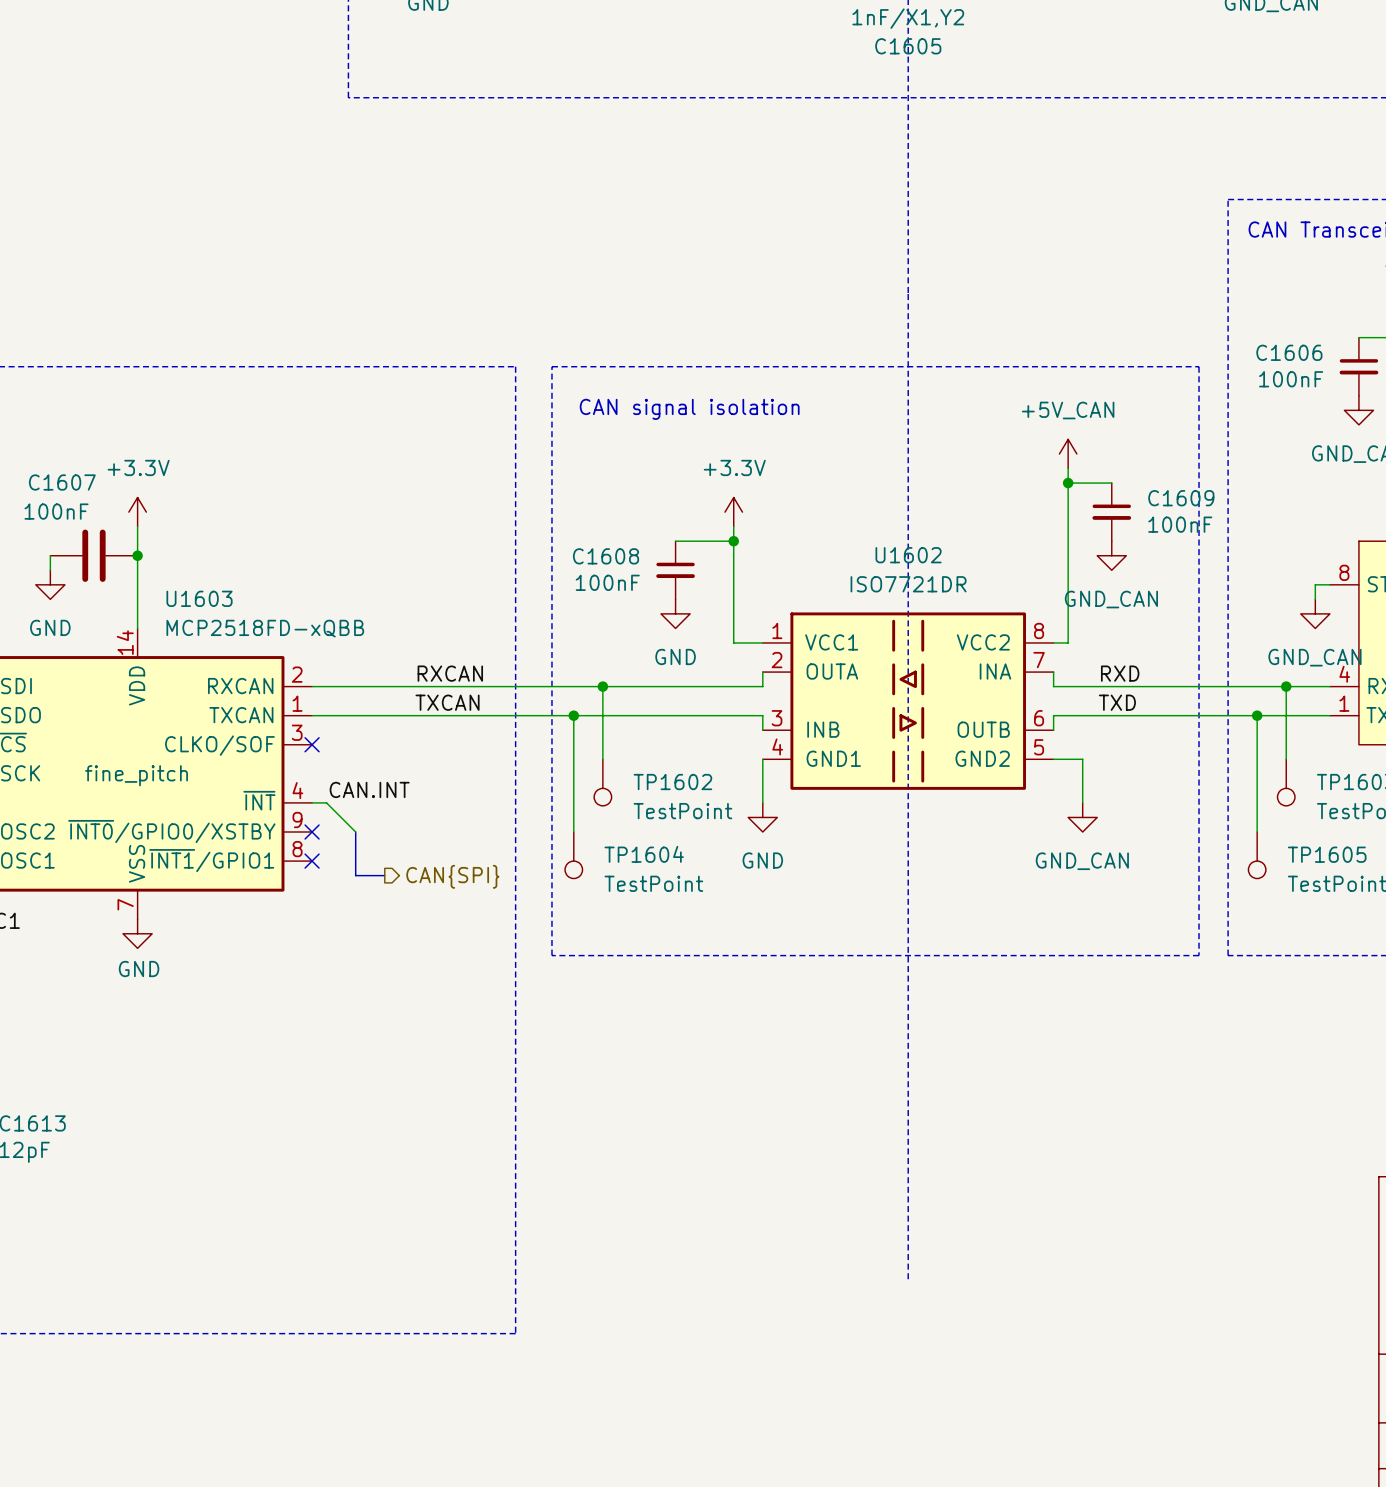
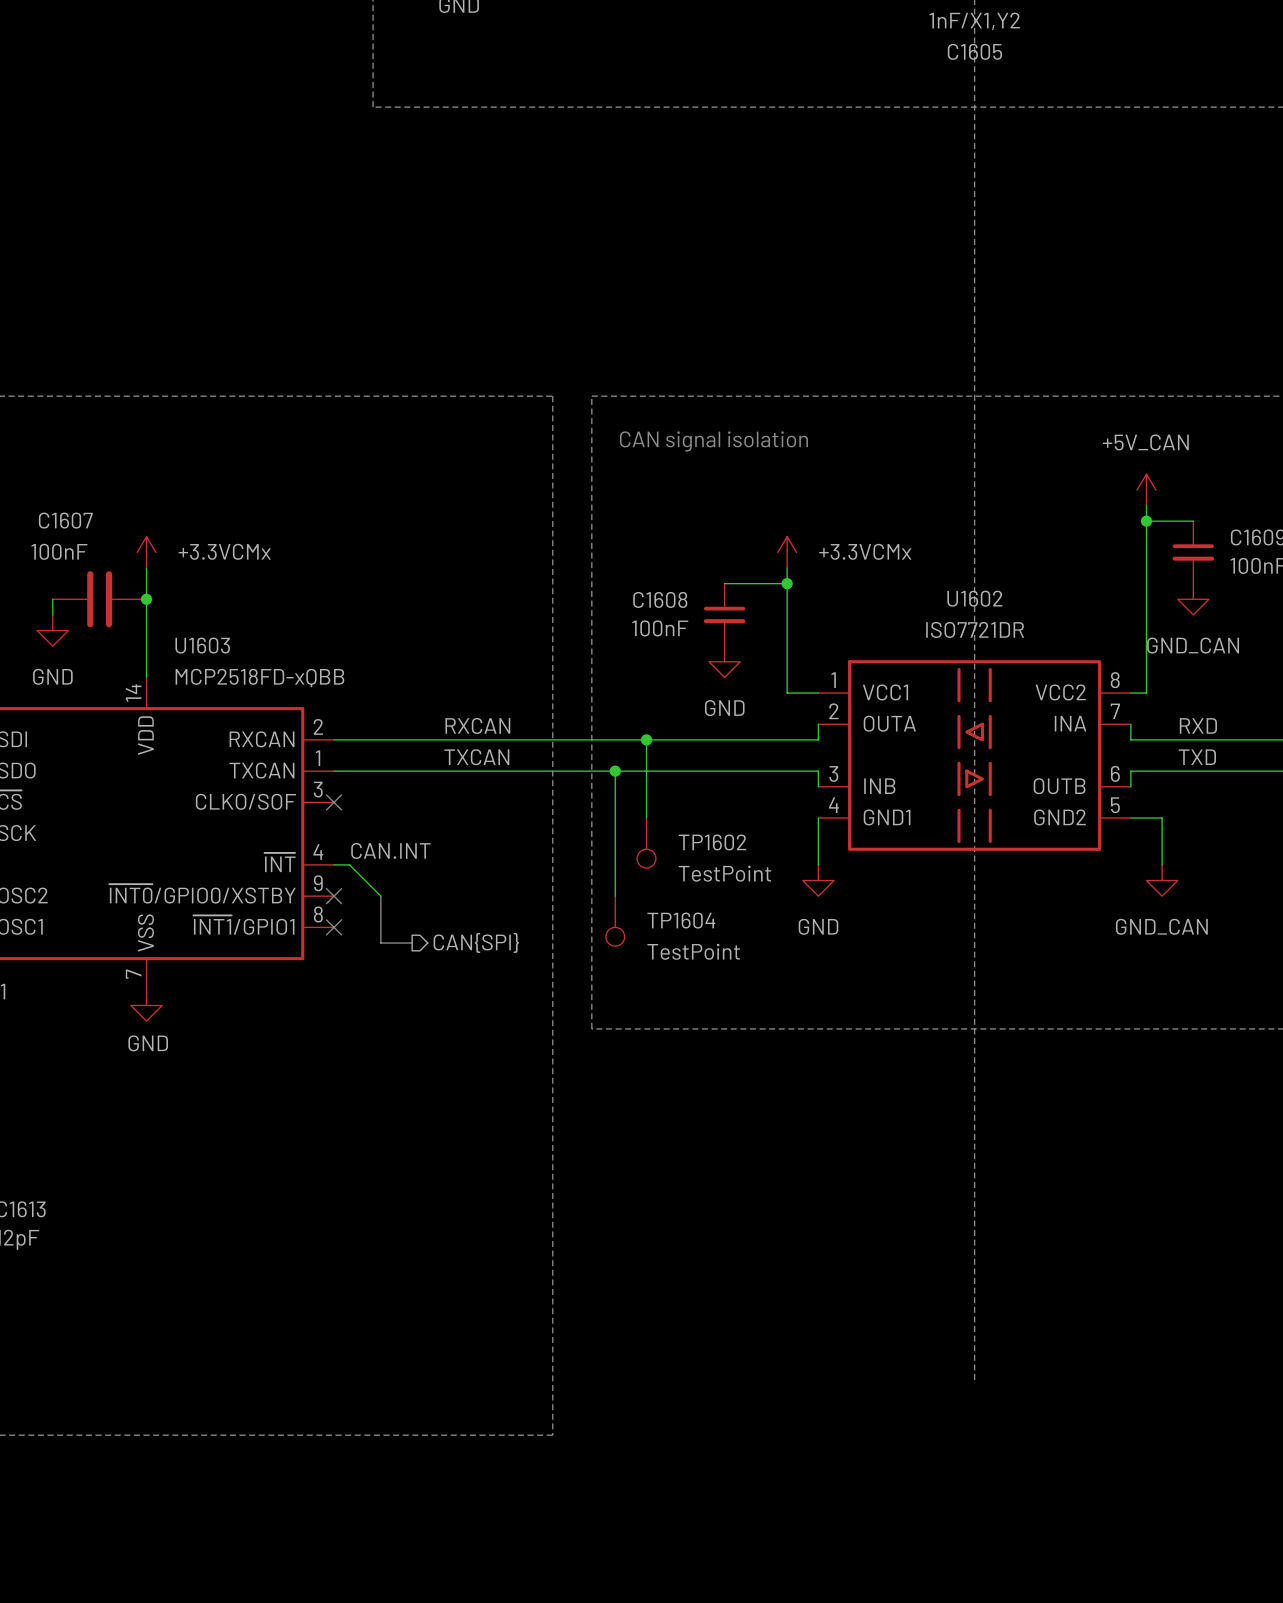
power symbol: +3.3V (137, 512) -> +3.3VCMx (146, 552)
power symbol: +3.3V (733, 512) -> +3.3VCMx (787, 552)
U1603 text: fine_pitch (136, 775) -> none

